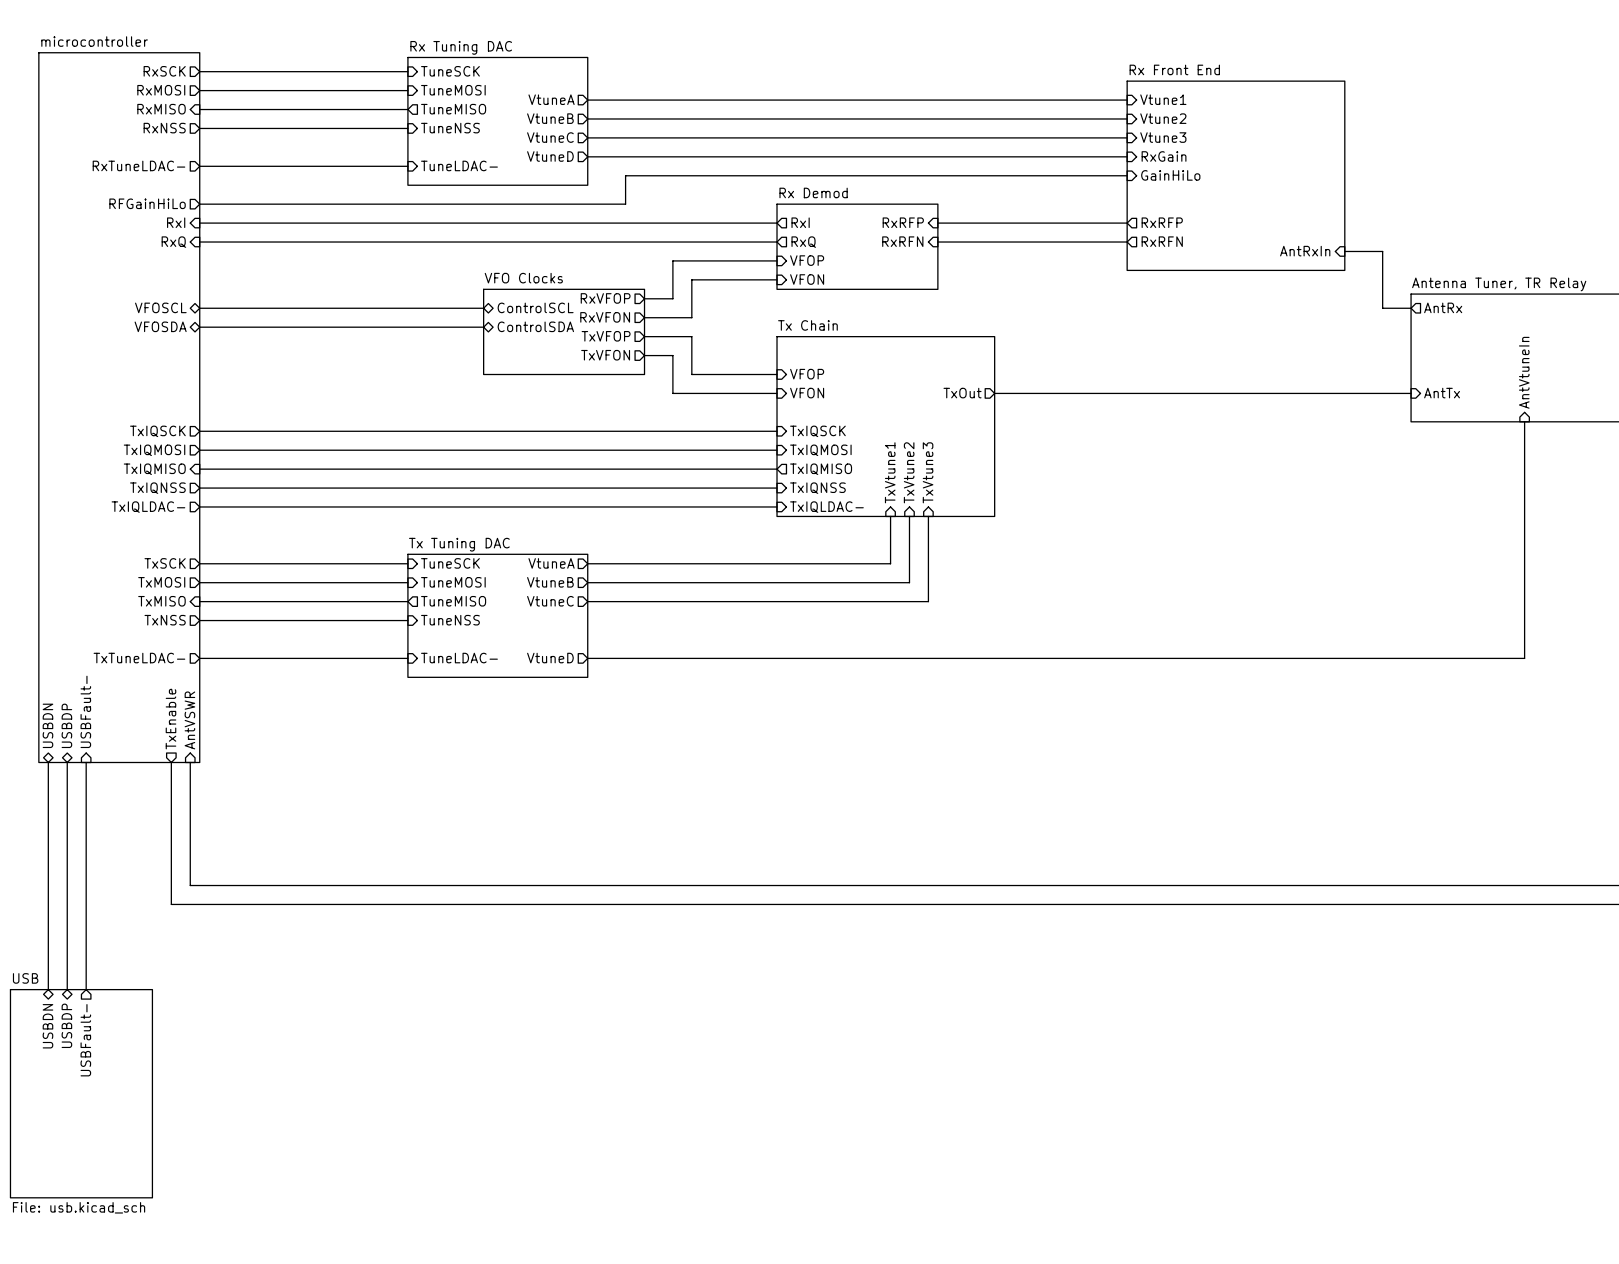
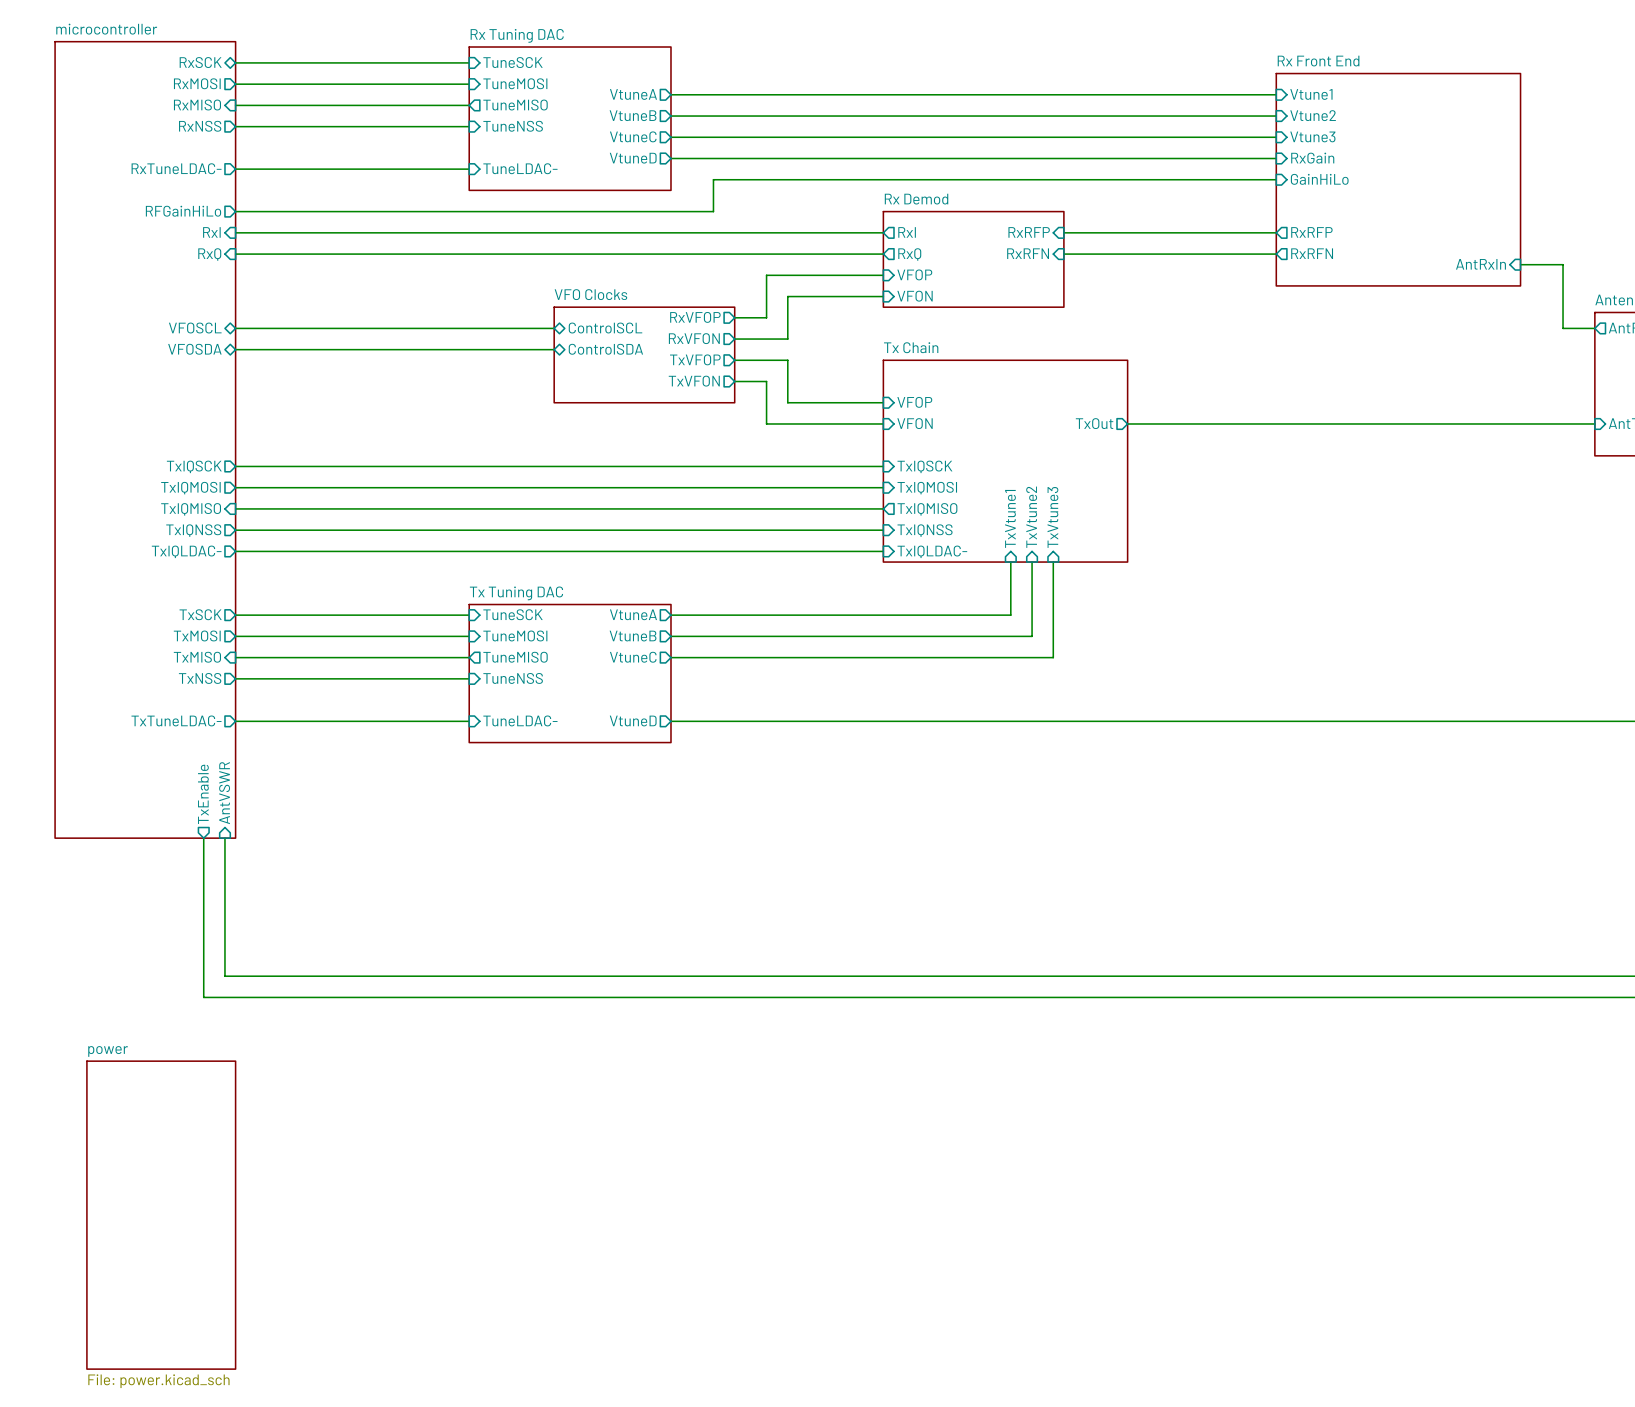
sheet pin shape: output (164, 71) -> bidirectional (200, 62)
sheet pin: USBFault- (85, 711) -> none
sheet pin: USBDN (47, 725) -> none
sheet pin: USBDP (66, 725) -> none
wire: (48, 762) (48, 989) -> none
wire: (67, 762) (67, 989) -> none
wire: (86, 762) (86, 989) -> none
sheet pin: USBDP (66, 1025) -> none
sheet pin: USBDN (47, 1026) -> none
sheet pin: USBFault- (85, 1040) -> none
sheet USB: File: usb.kicad_sch (81, 1093) -> none
sheet power: none -> File: power.kicad_sch (161, 1215)

